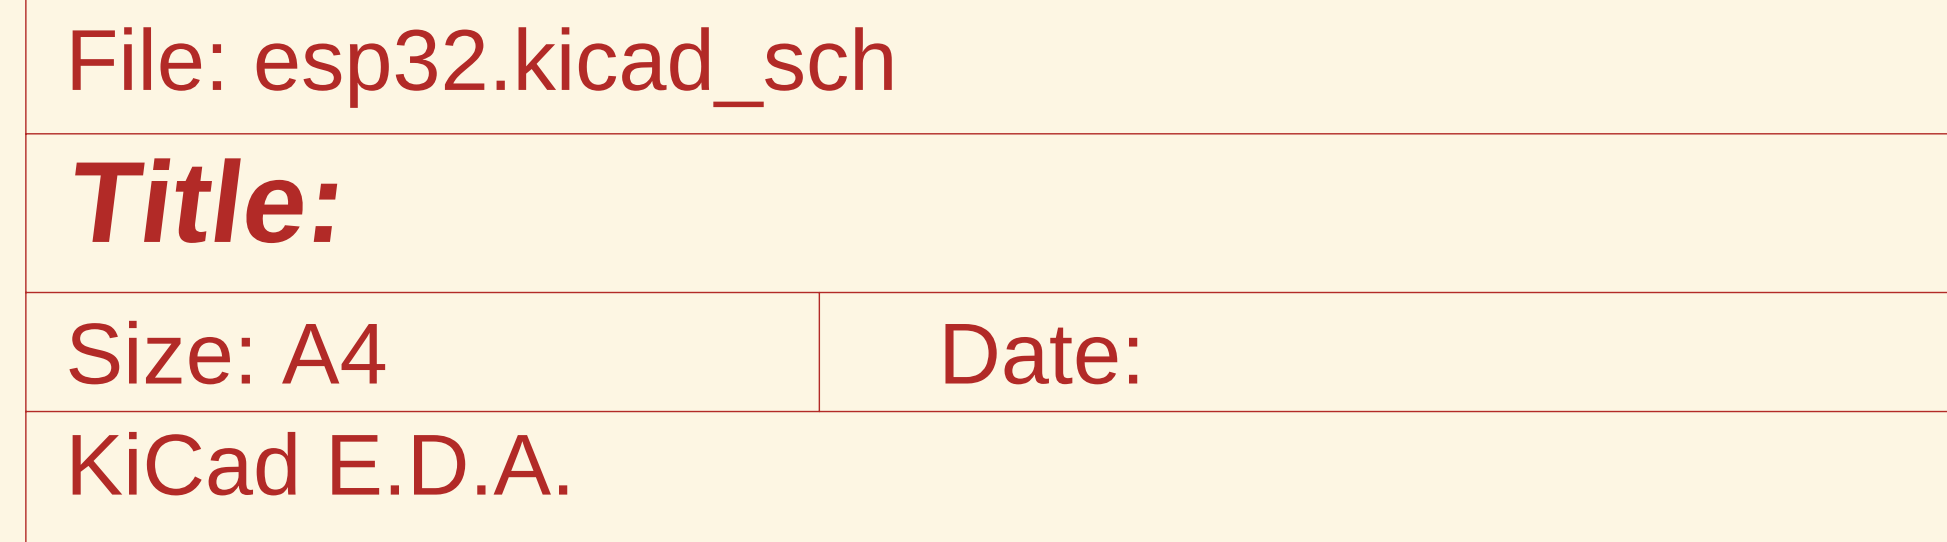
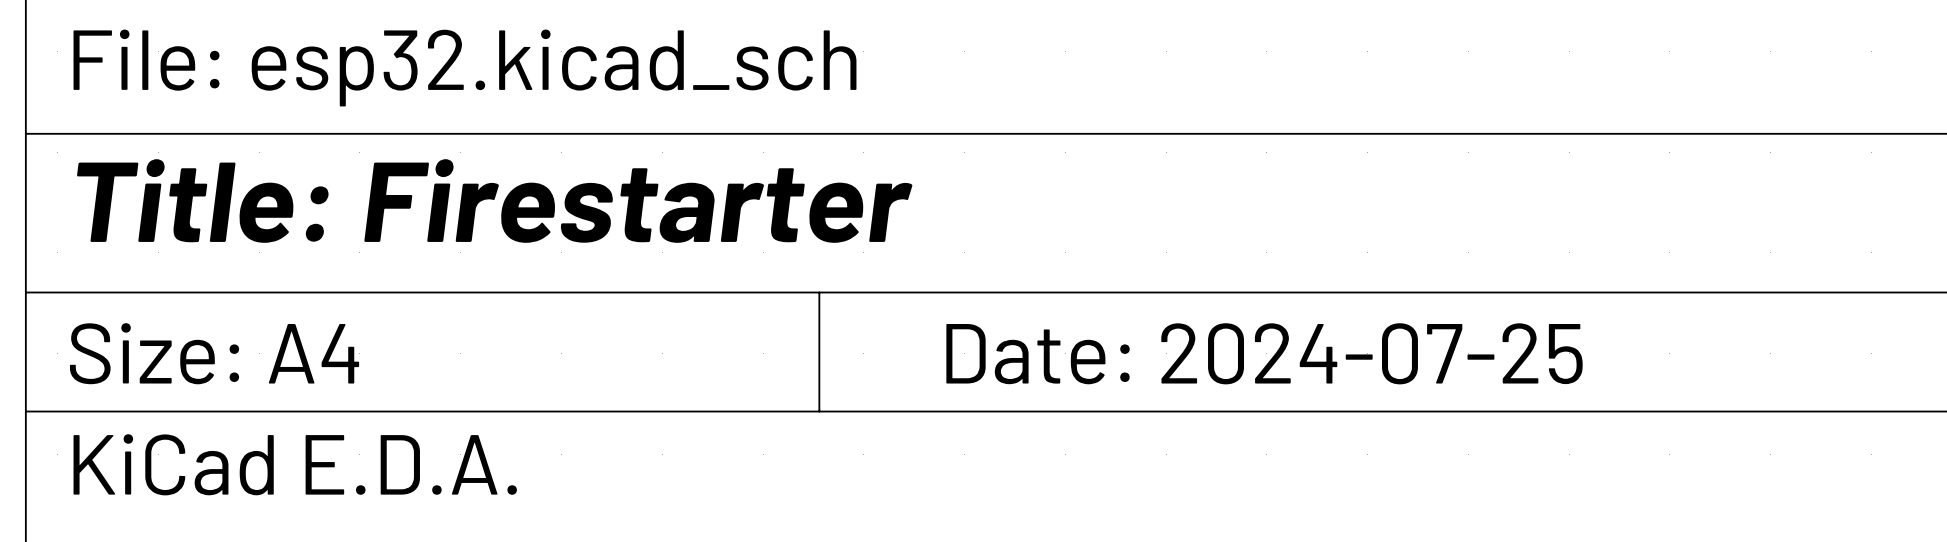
title block: Title: (206, 200) -> Title: Firestarter (494, 201)
title block: Date: (1041, 354) -> Date: 2024-07-25 (1264, 353)

